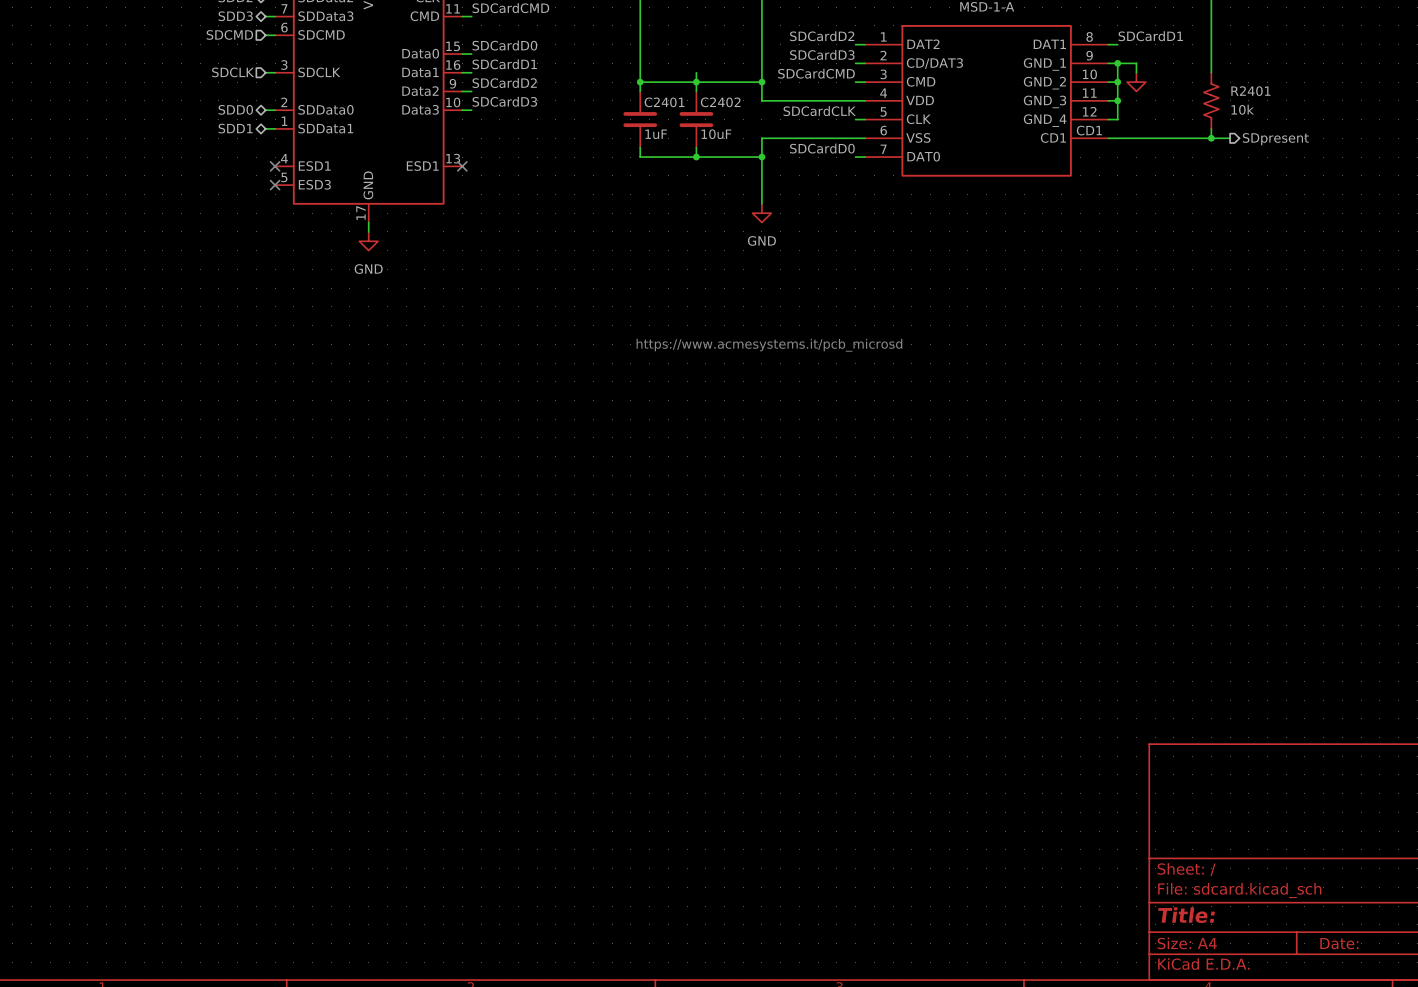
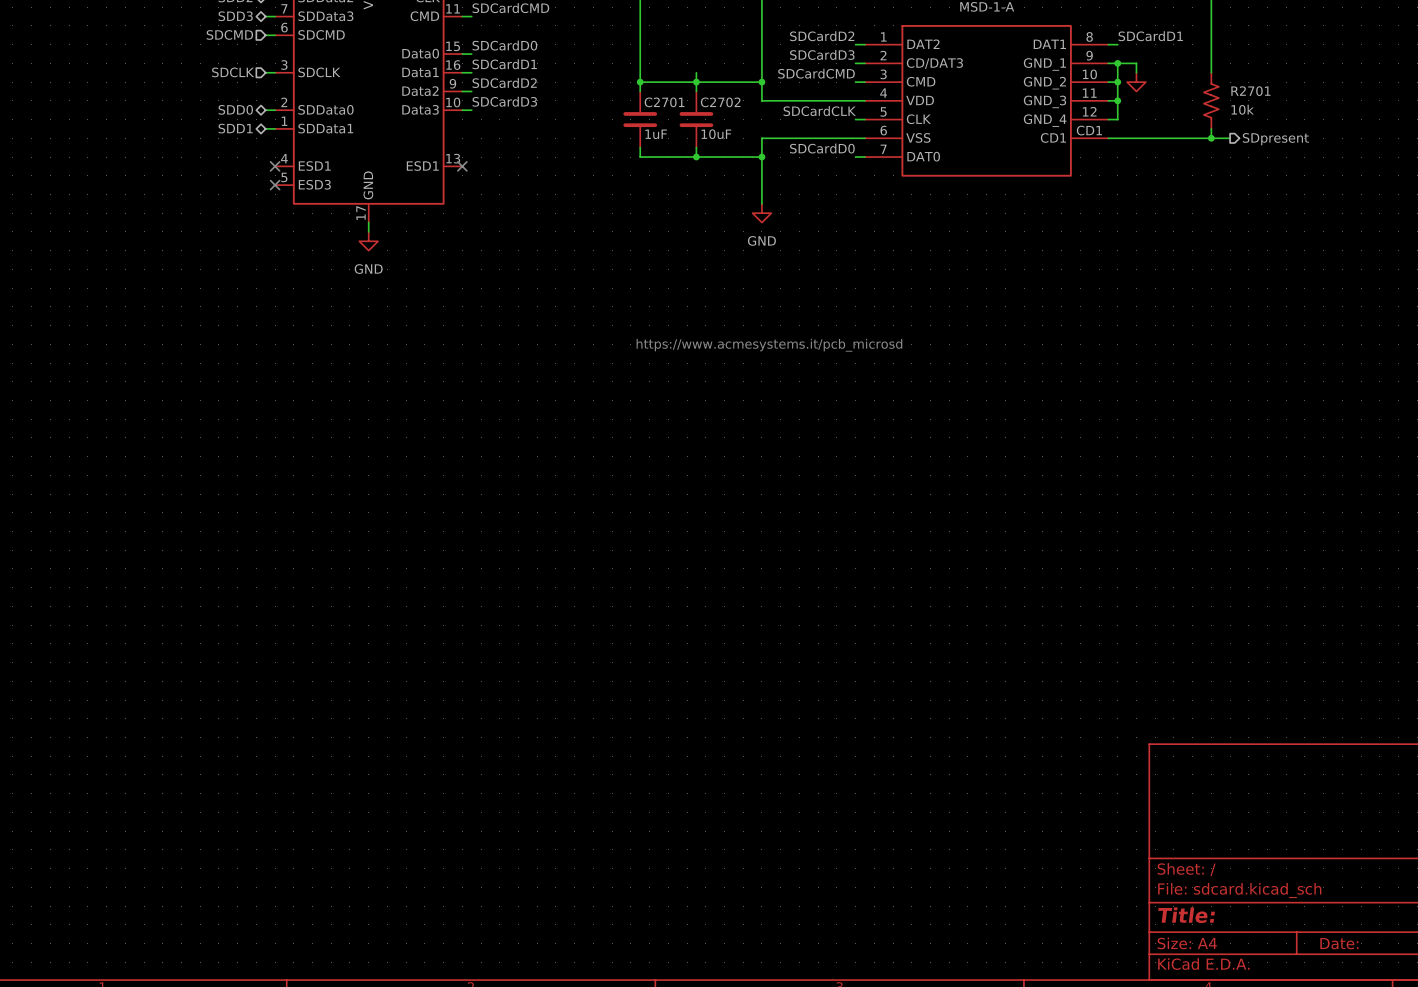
R2401 name: R2401 (1250, 91) -> R2701 (1250, 91)
C2401 name: C2401 (664, 102) -> C2701 (664, 102)
C2402 name: C2402 (720, 102) -> C2702 (720, 102)

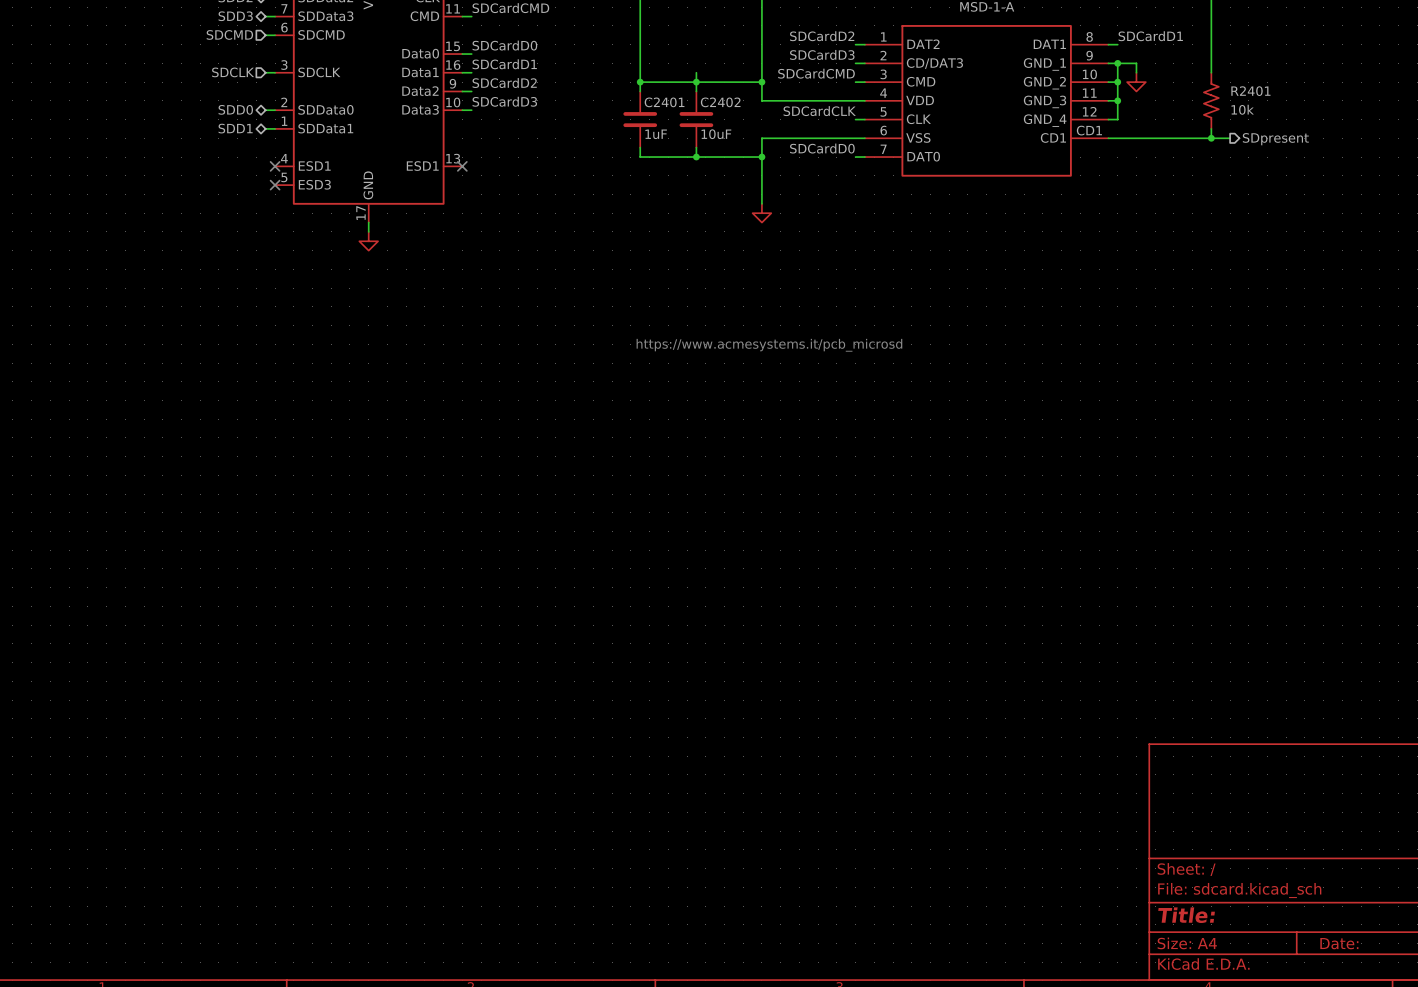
R2701 name: R2701 (1250, 91) -> R2401 (1250, 91)
C2701 name: C2701 (664, 102) -> C2401 (664, 102)
C2702 name: C2702 (720, 102) -> C2402 (720, 102)
power symbol text: GND (761, 240) -> none
power symbol text: GND (368, 269) -> none

